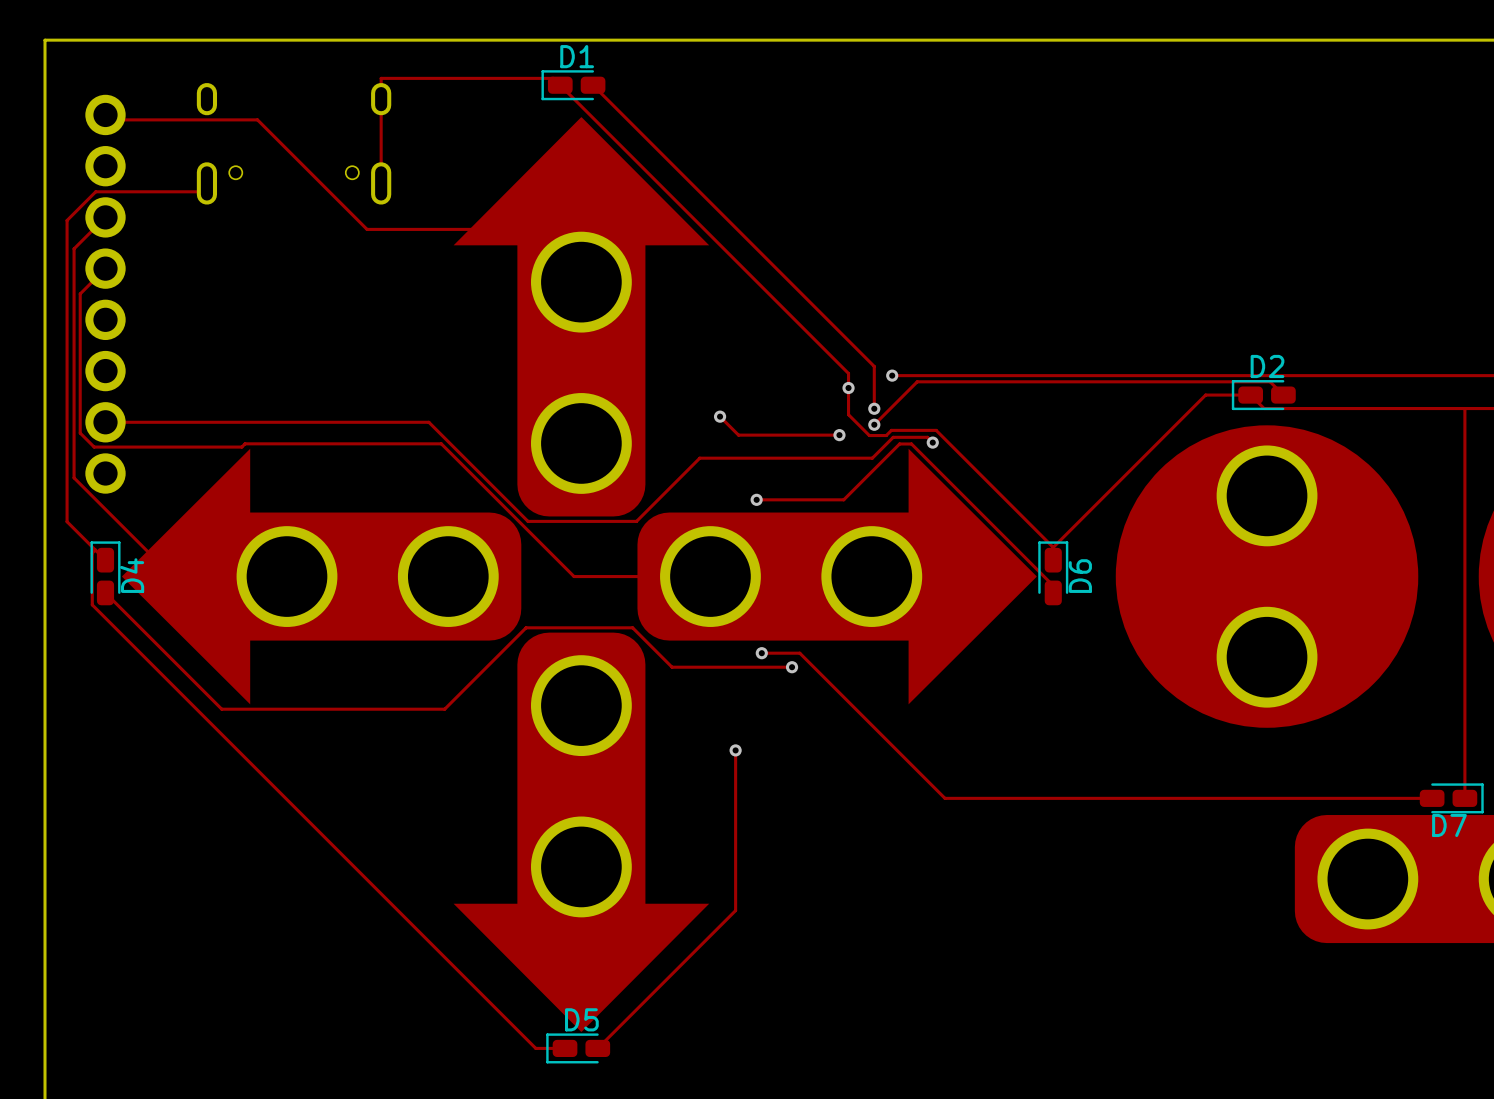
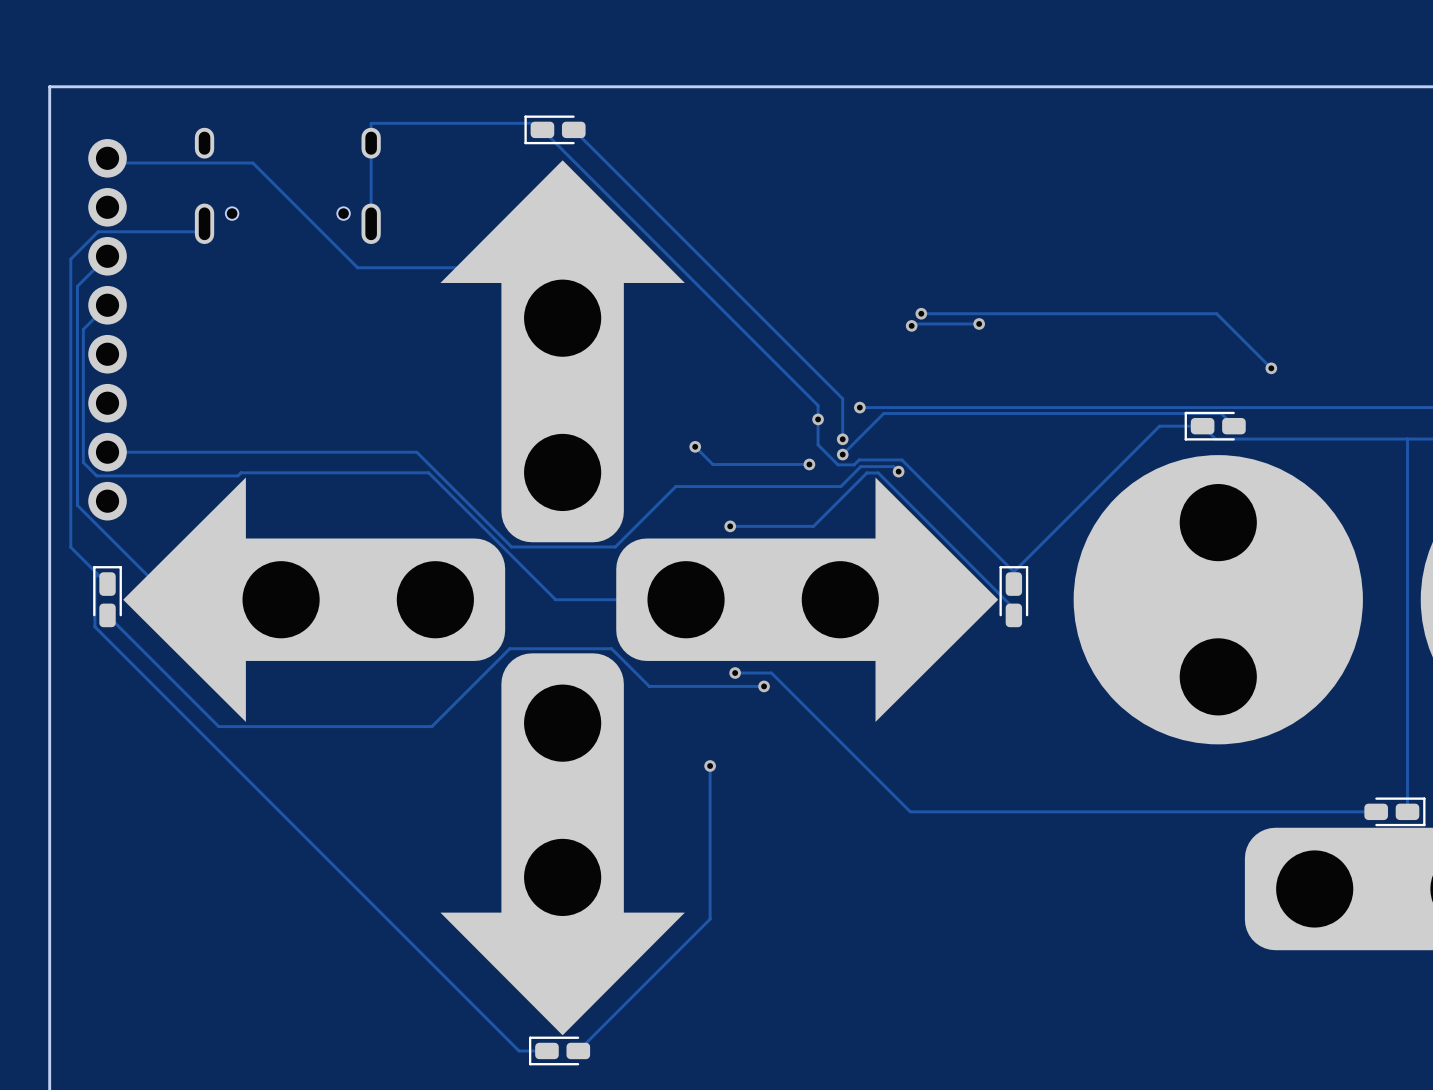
D1 name: D1 (577, 56) -> none
track: none -> (921, 313) (1216, 313) (1271, 368)
via: none -> (921, 313)
track: none -> (979, 323) (913, 323) (911, 325)
via: none -> (979, 323)
via: none -> (911, 325)
via: none -> (1271, 368)
D2 name: D2 (1267, 366) -> none
D4 name: D4 (132, 575) -> none
D6 name: D6 (1080, 576) -> none
D7 name: D7 (1449, 825) -> none
D5 name: D5 (581, 1019) -> none

